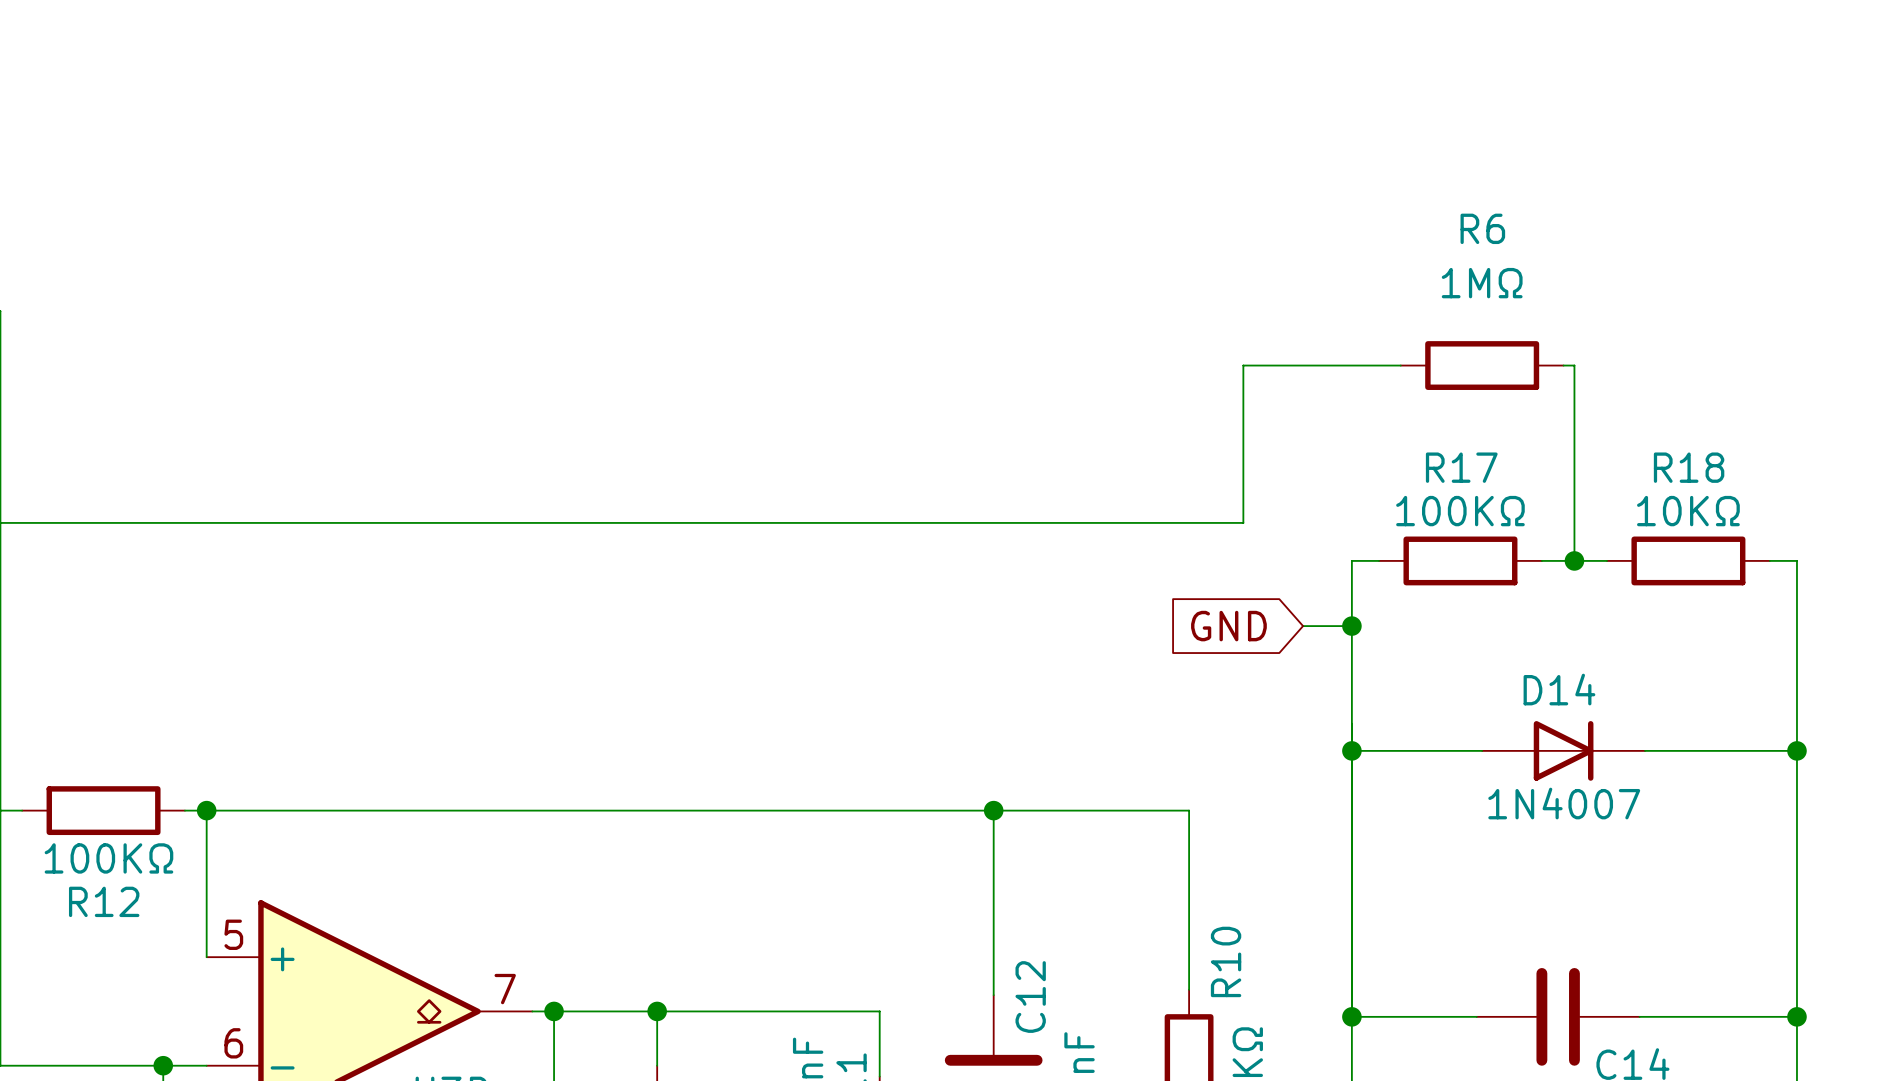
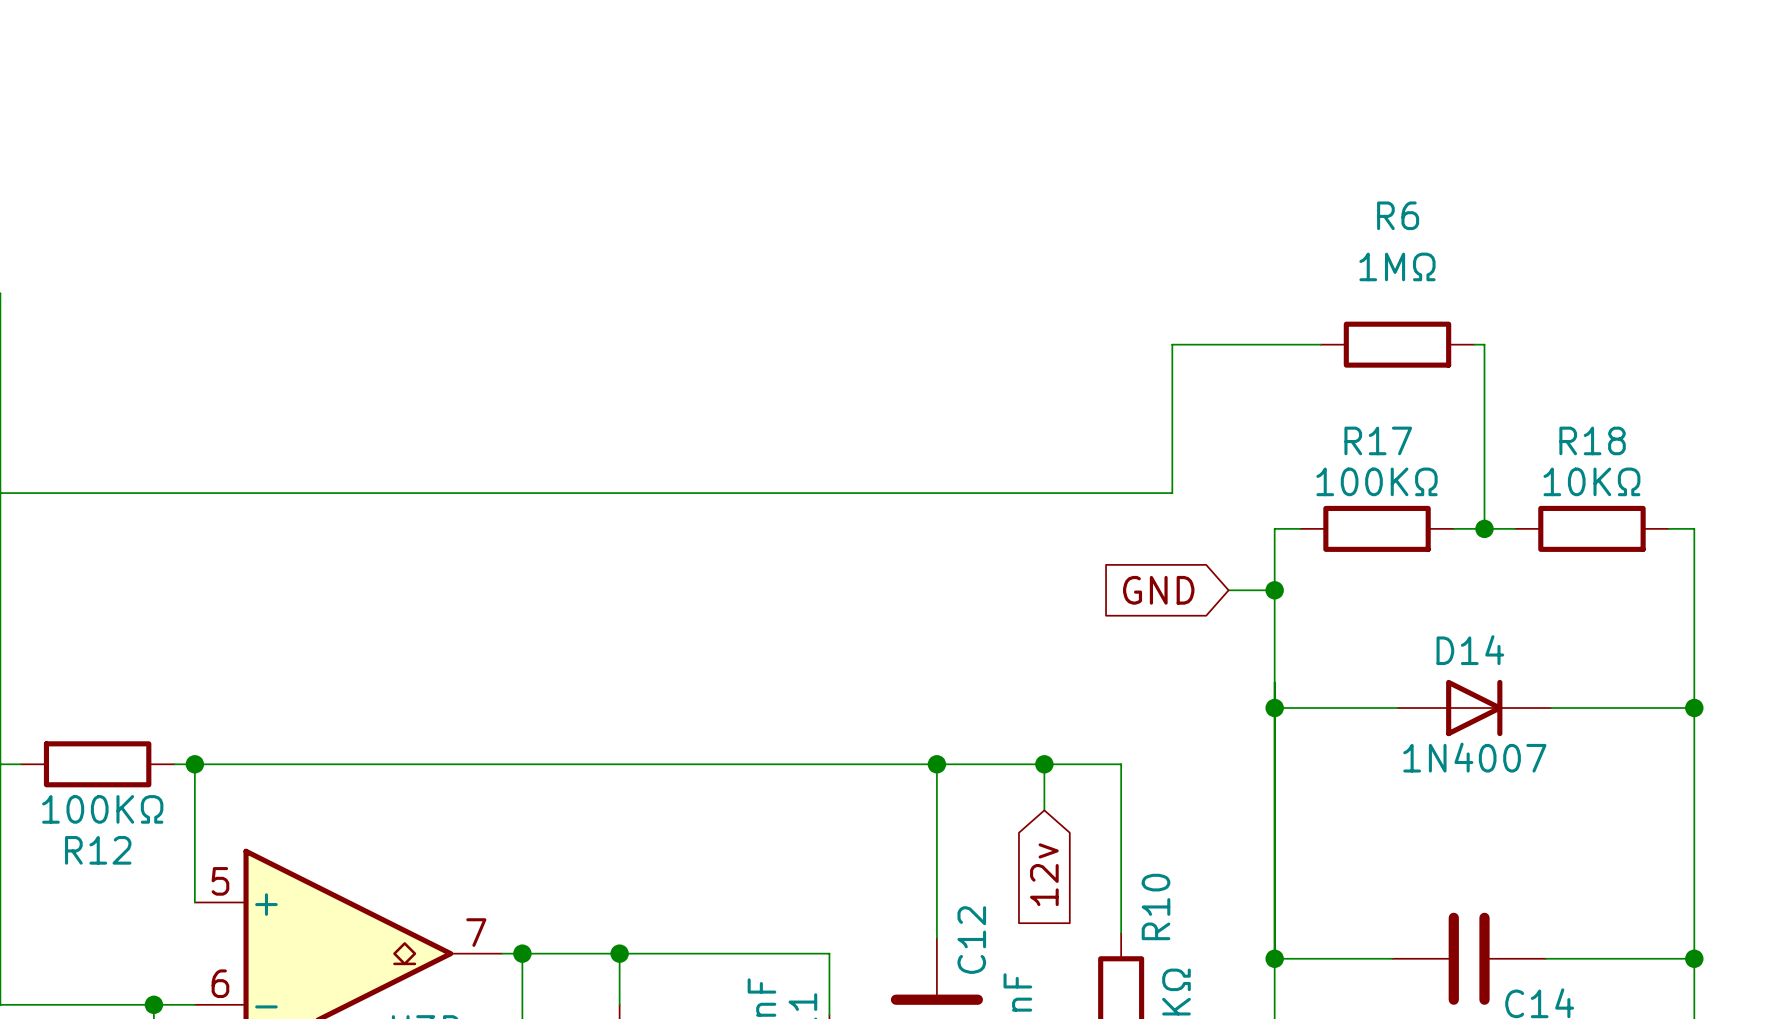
wire: none -> (1044, 764) (1044, 810)
junction: none -> (1044, 764)
global label: none -> 12v (1044, 874)

